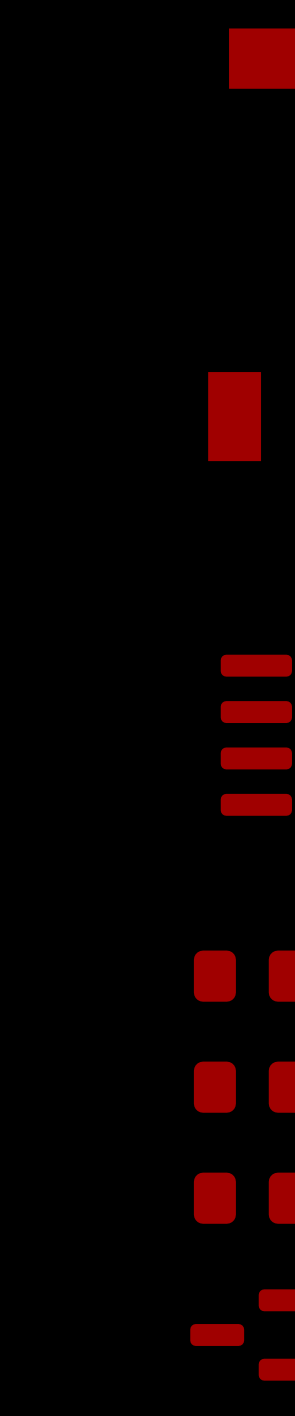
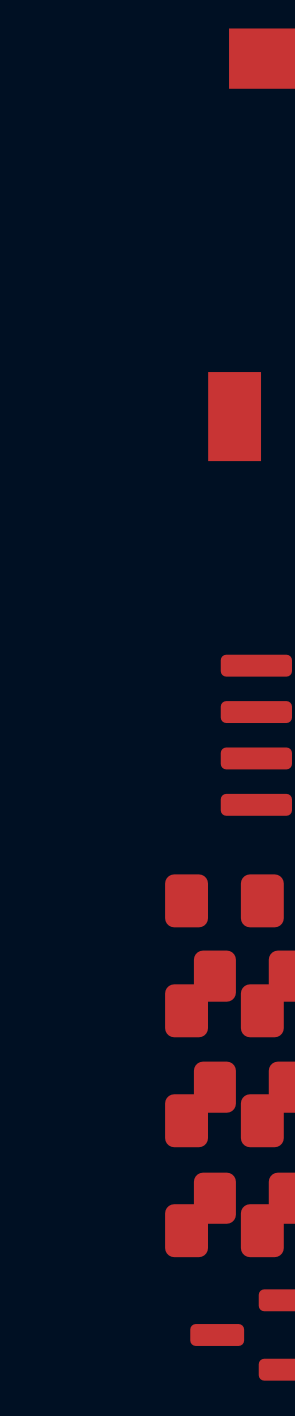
part: none -> (224, 900)
part: none -> (224, 1010)
part: none -> (224, 1120)
part: none -> (224, 1230)

